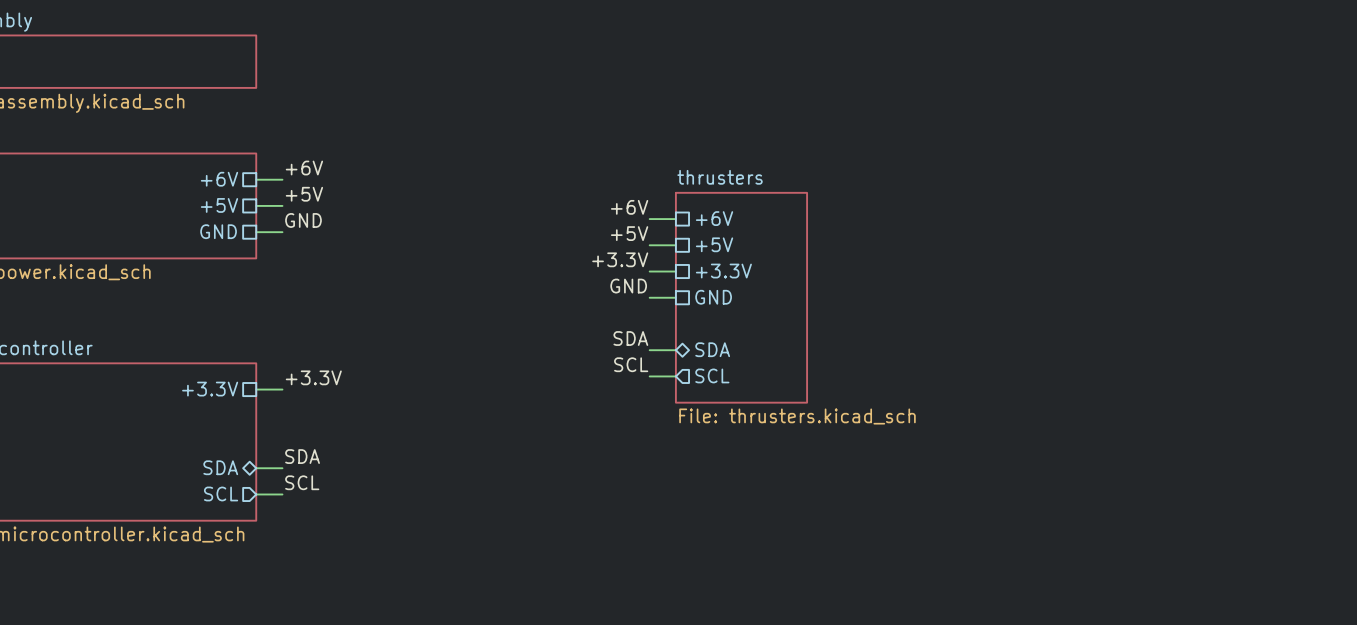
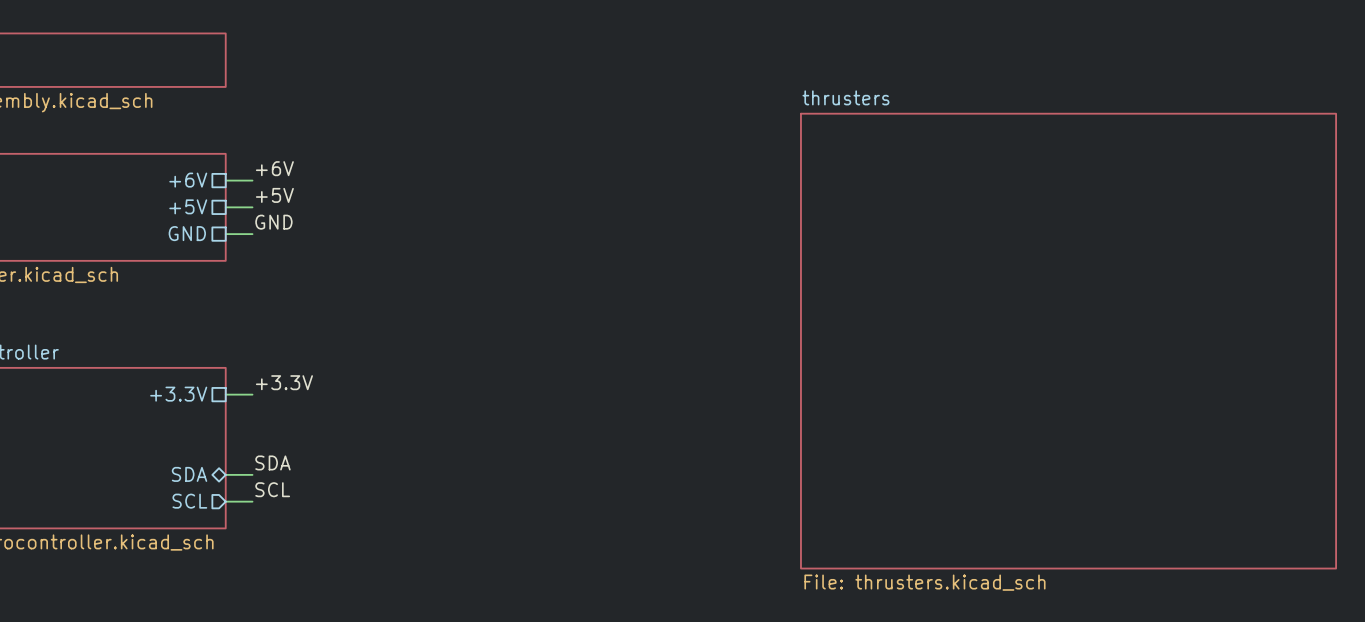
label: +6V (629, 207) -> none
sheet pin: +6V (714, 218) -> none
wire: (649, 219) (675, 219) -> none
label: +5V (629, 233) -> none
sheet pin: +5V (714, 244) -> none
wire: (649, 245) (675, 245) -> none
label: +3.3V (620, 259) -> none
wire: (649, 271) (675, 271) -> none
sheet pin: +3.3V (723, 271) -> none
label: GND (628, 286) -> none
wire: (649, 297) (675, 297) -> none
sheet pin: GND (713, 297) -> none
sheet thrusters: File: thrusters.kicad_sch (741, 297) -> none
sheet thrusters: none -> File: thrusters.kicad_sch (1068, 341)
label: SDA (630, 338) -> none
sheet pin: SDA (712, 349) -> none
wire: (649, 350) (675, 350) -> none
label: SCL (631, 364) -> none
sheet pin: SCL (712, 375) -> none
wire: (649, 376) (675, 376) -> none

